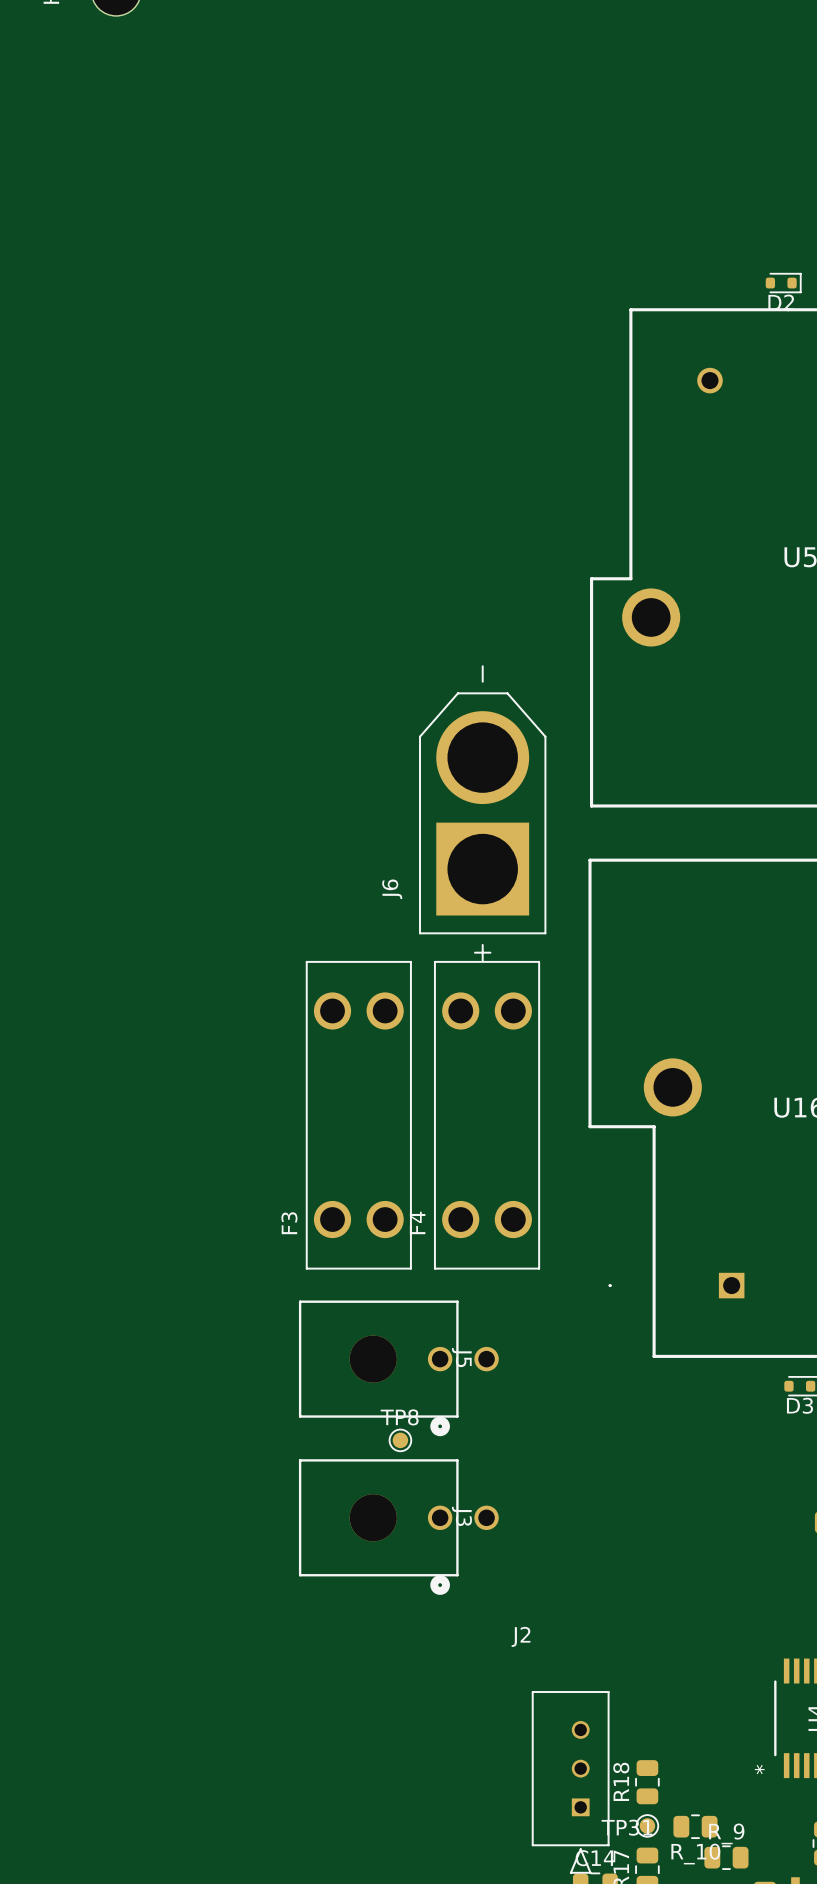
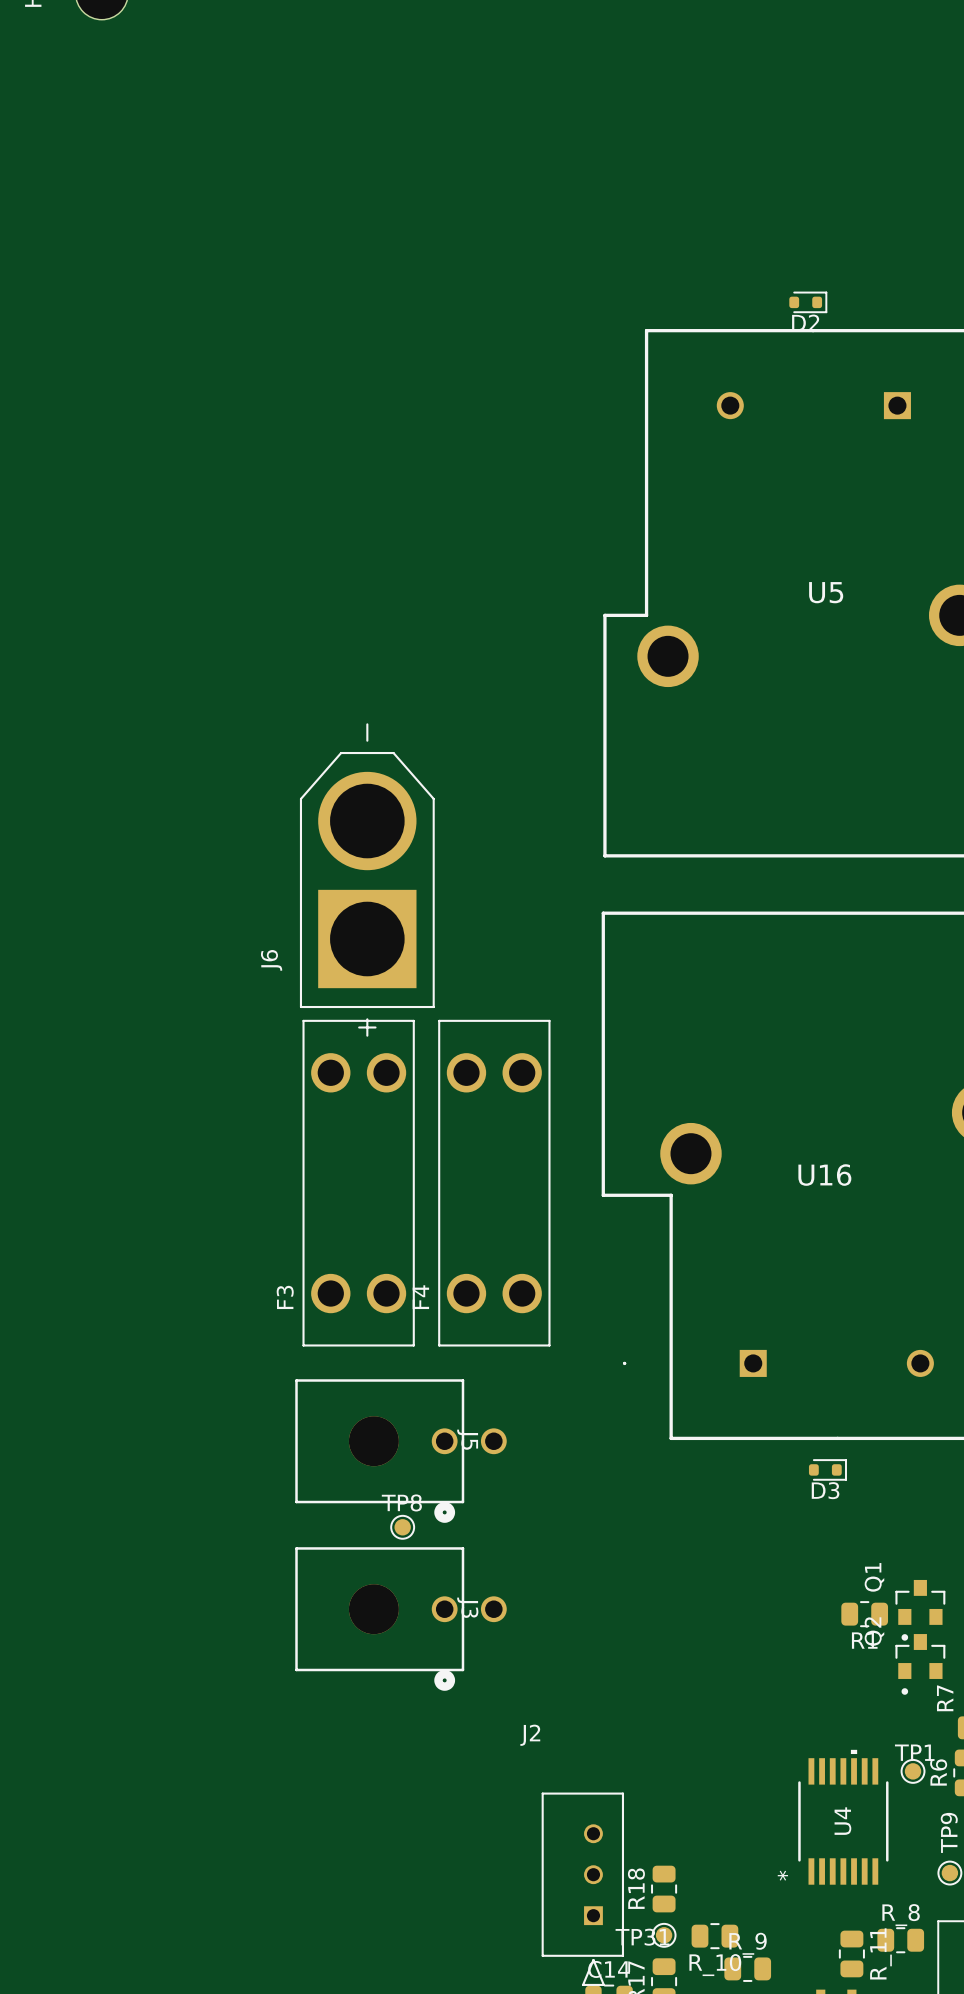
J6 position: (482, 813) -> (367, 880)

